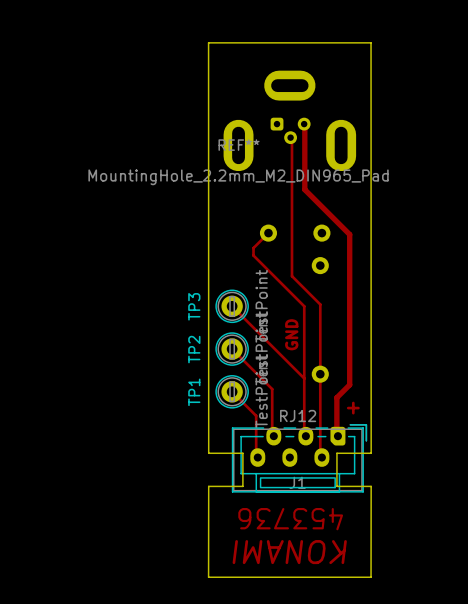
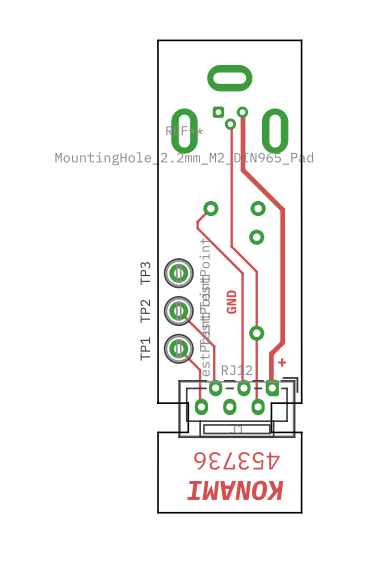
top track: (232, 306) (304, 378) -> none

